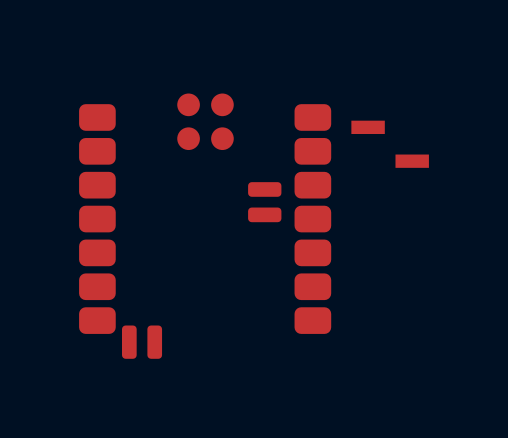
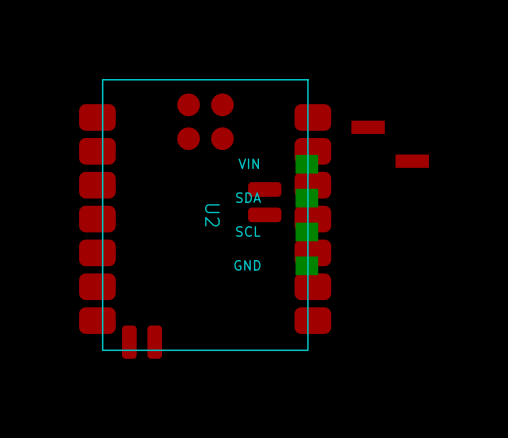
U2: none -> (210, 215)

